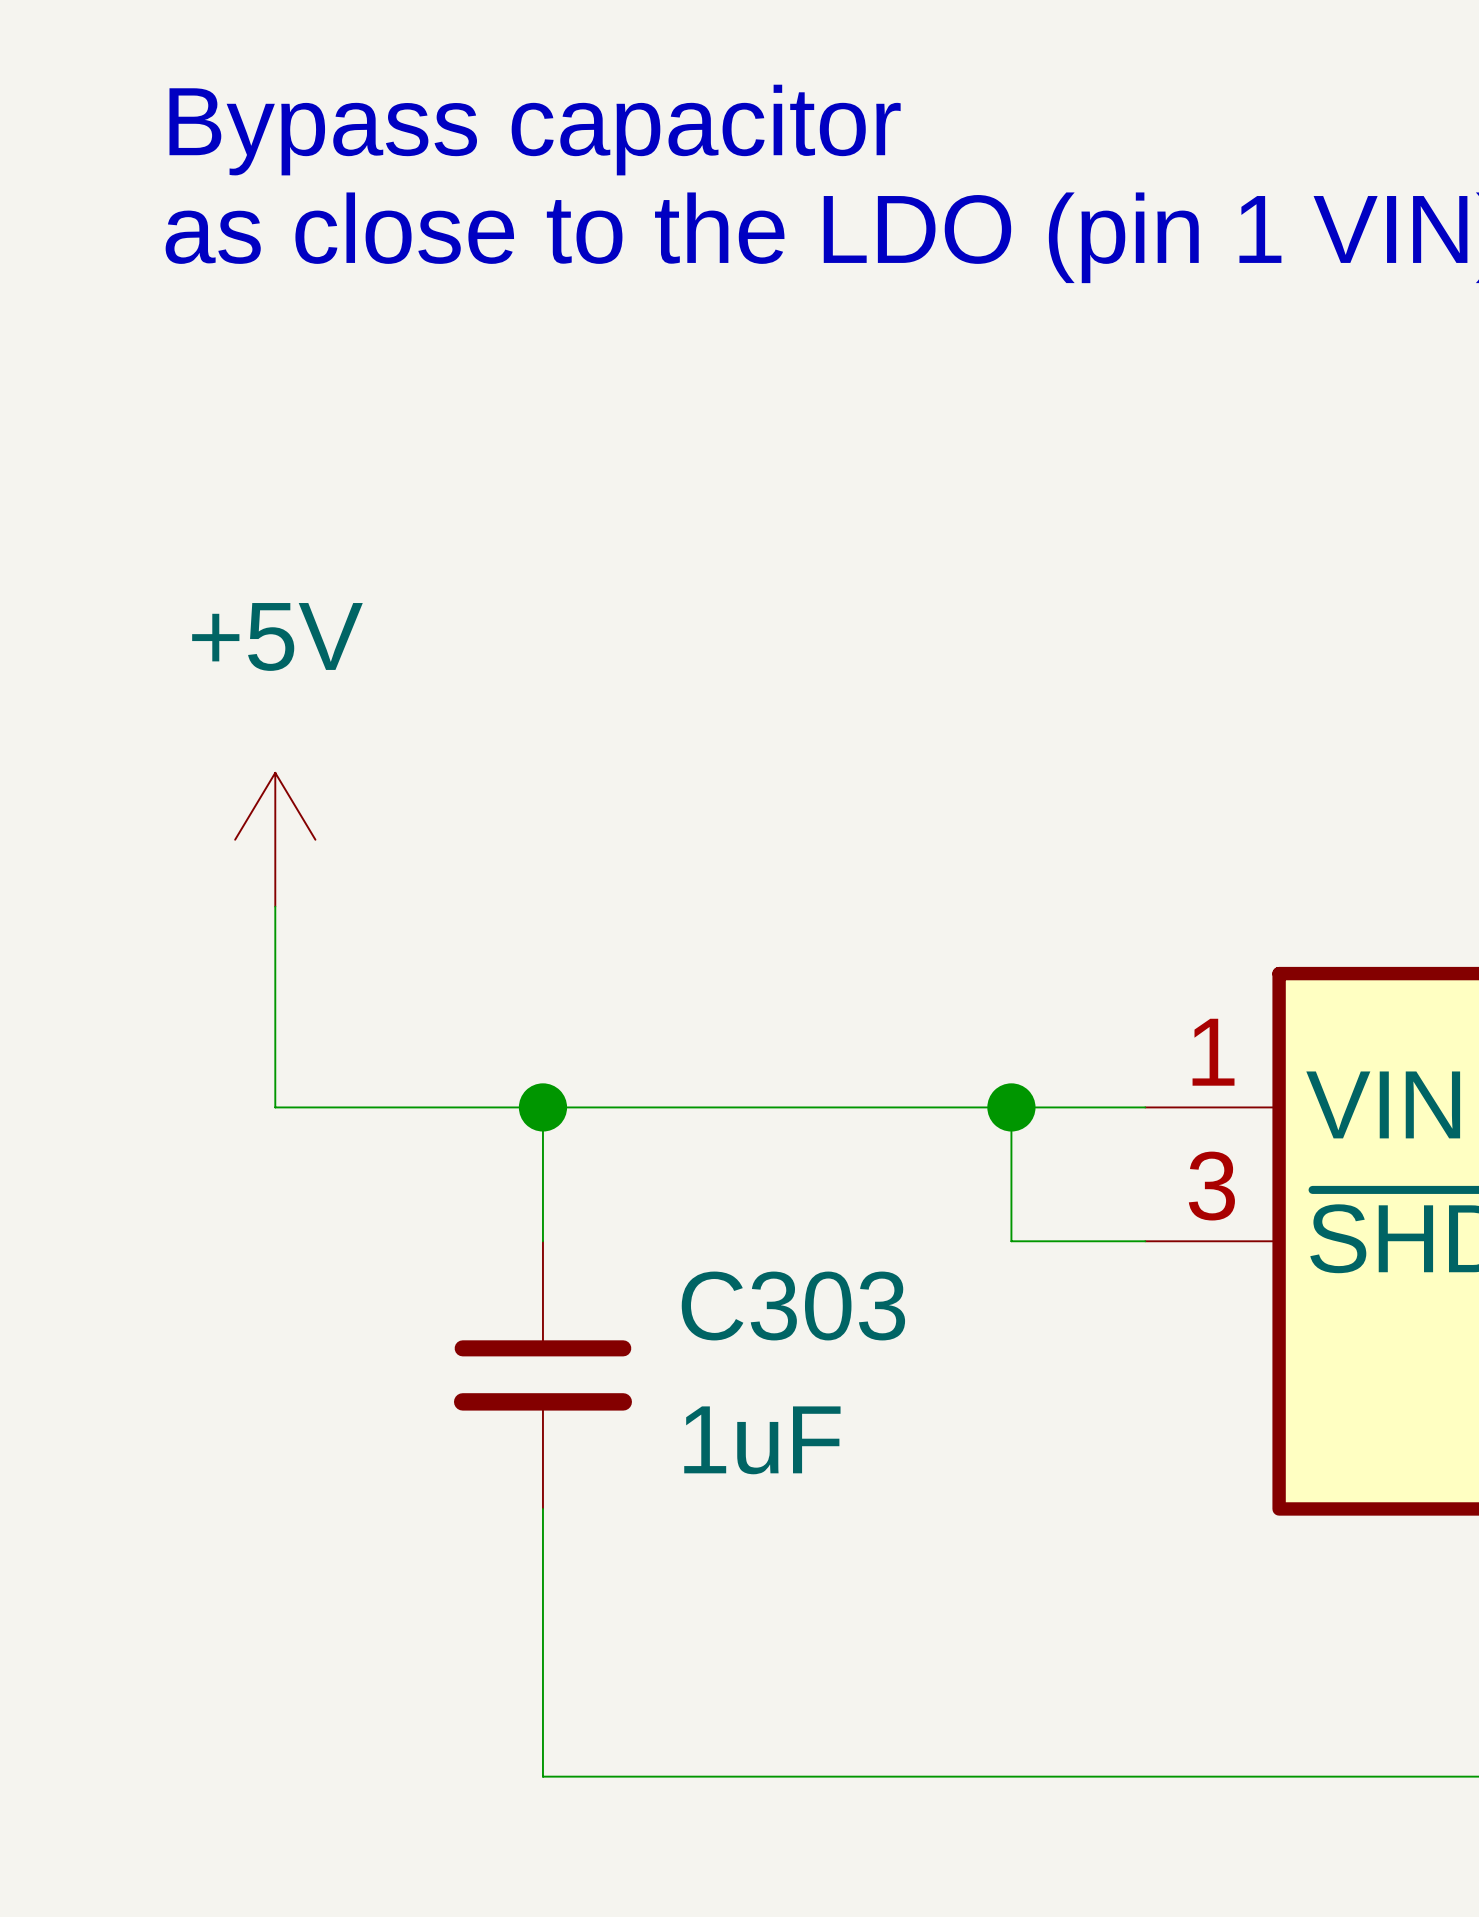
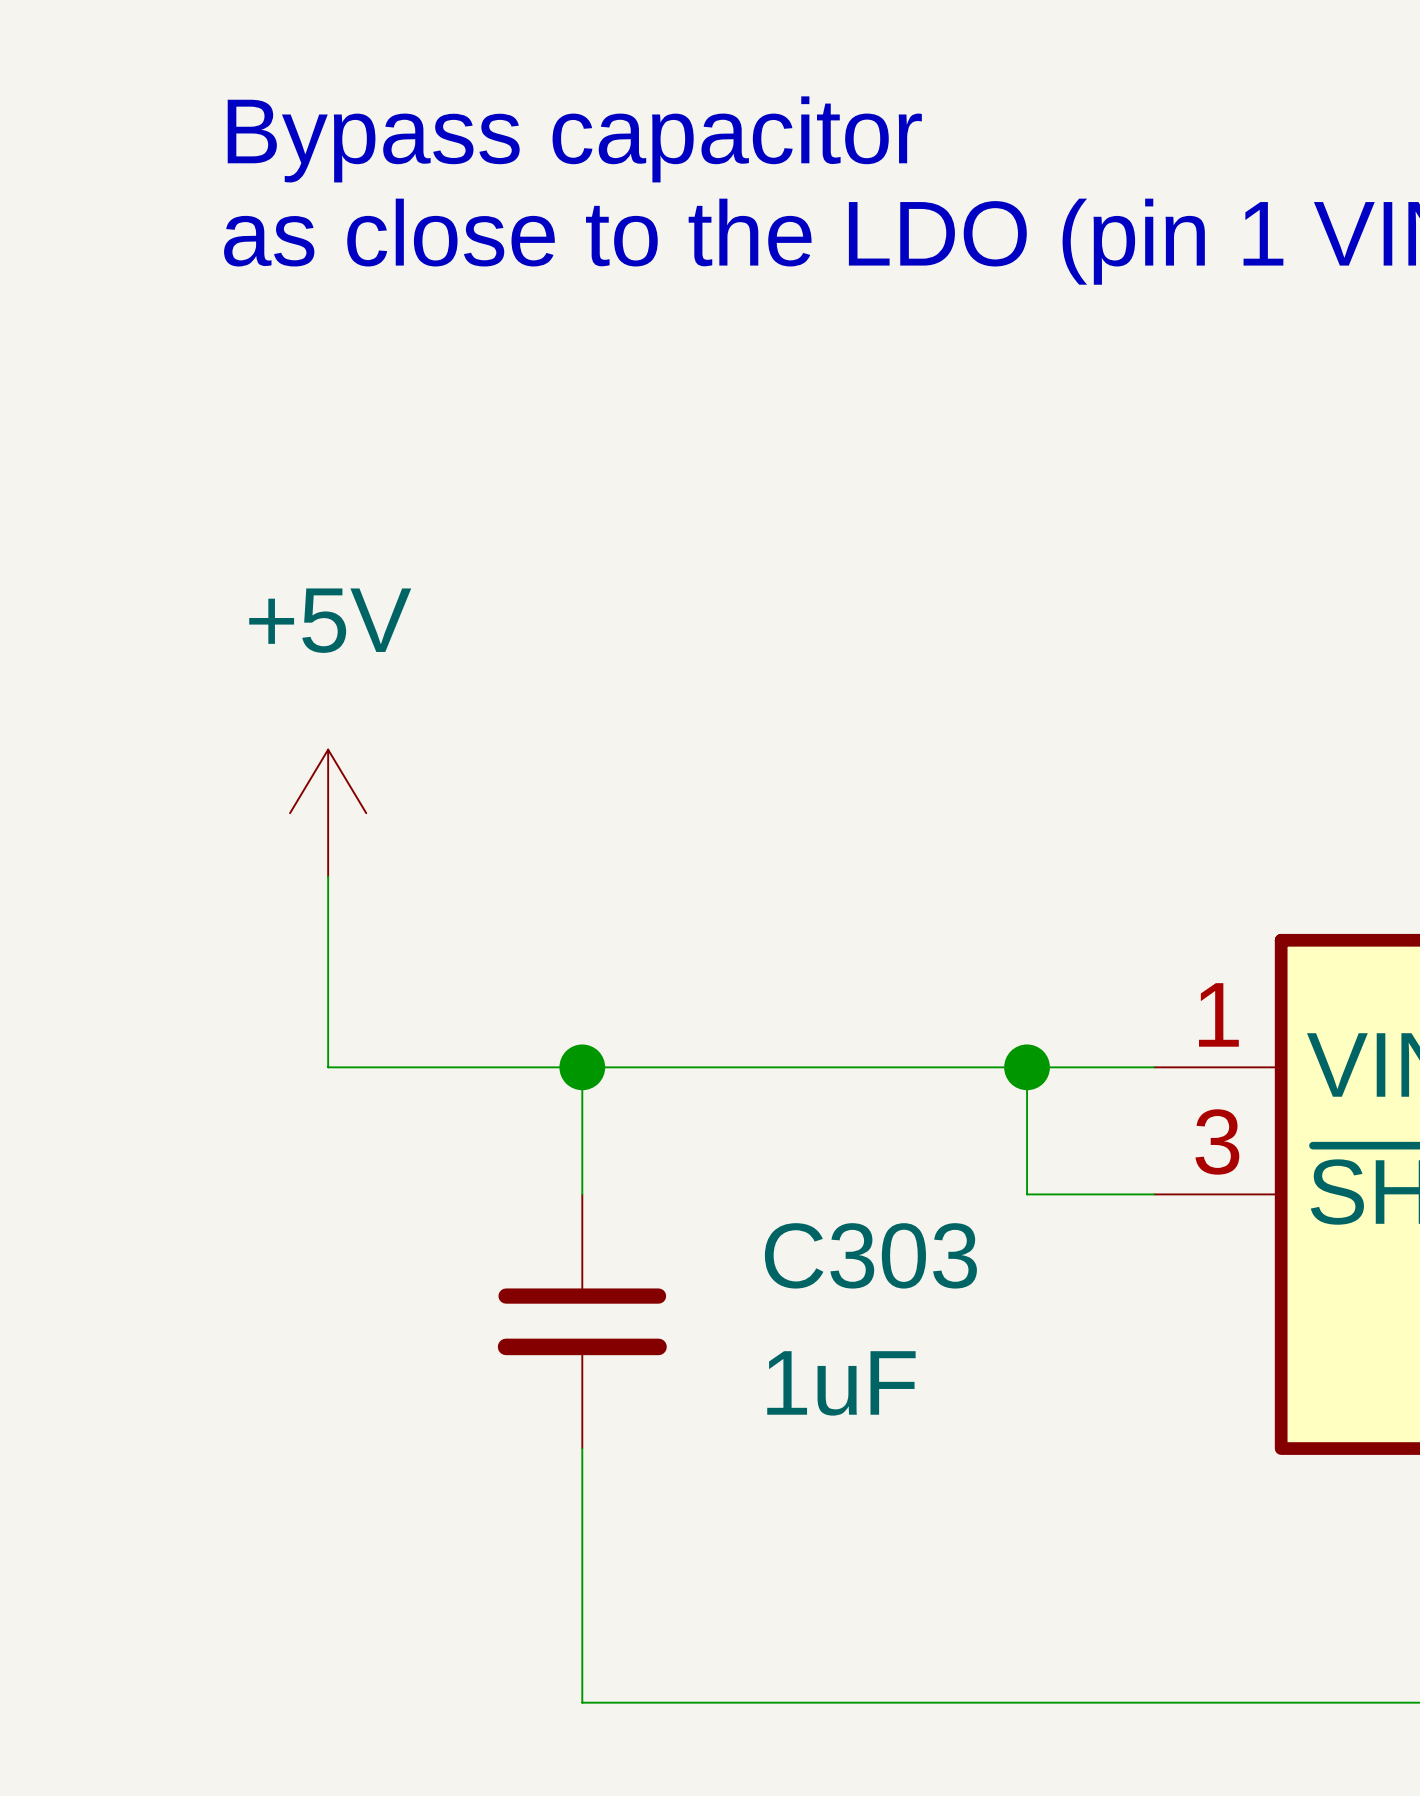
C303 name position: C303 (793, 1306) -> C303 (870, 1255)
C303 value position: 1uF (762, 1440) -> 1uF (841, 1383)

